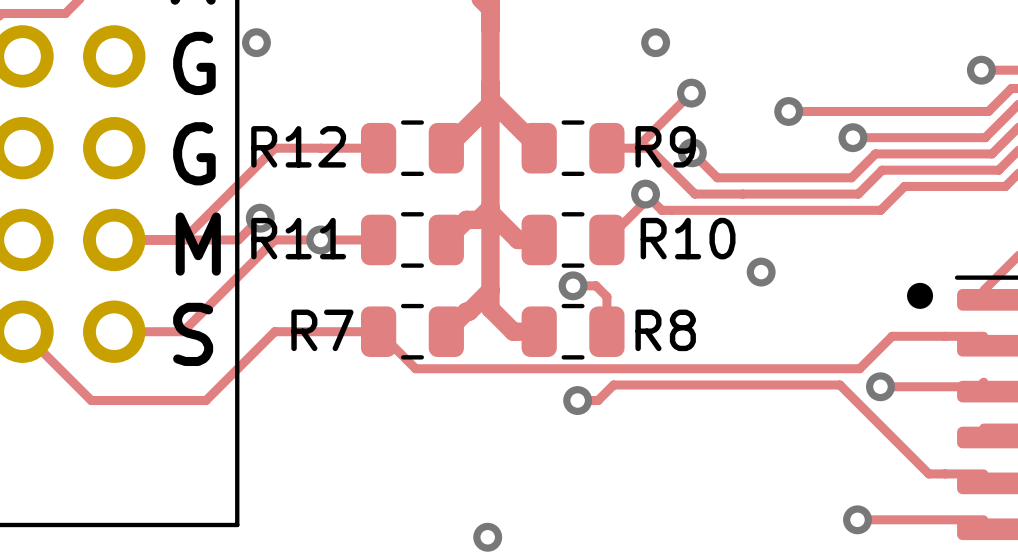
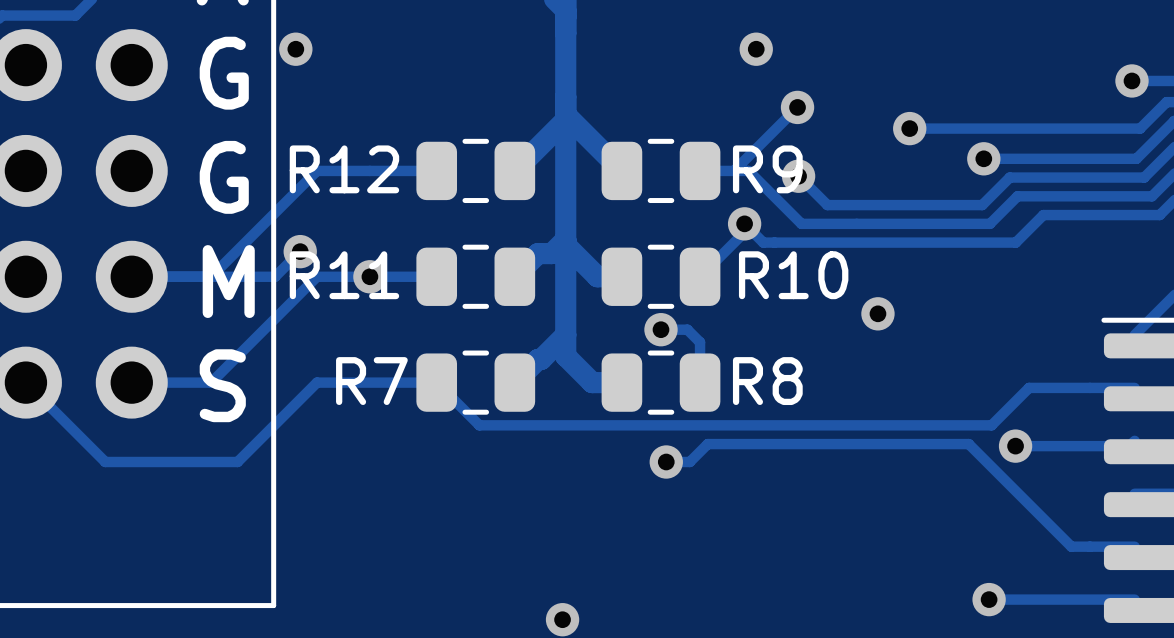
drawing: [907, 282, 934, 309] -> none

